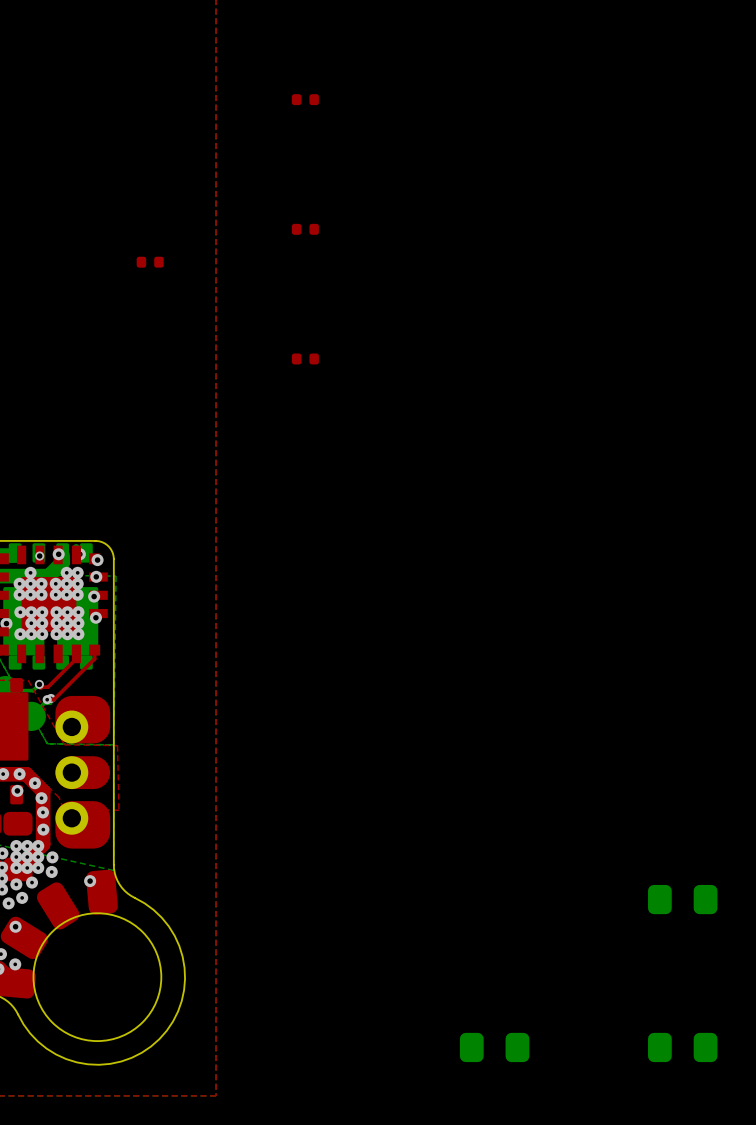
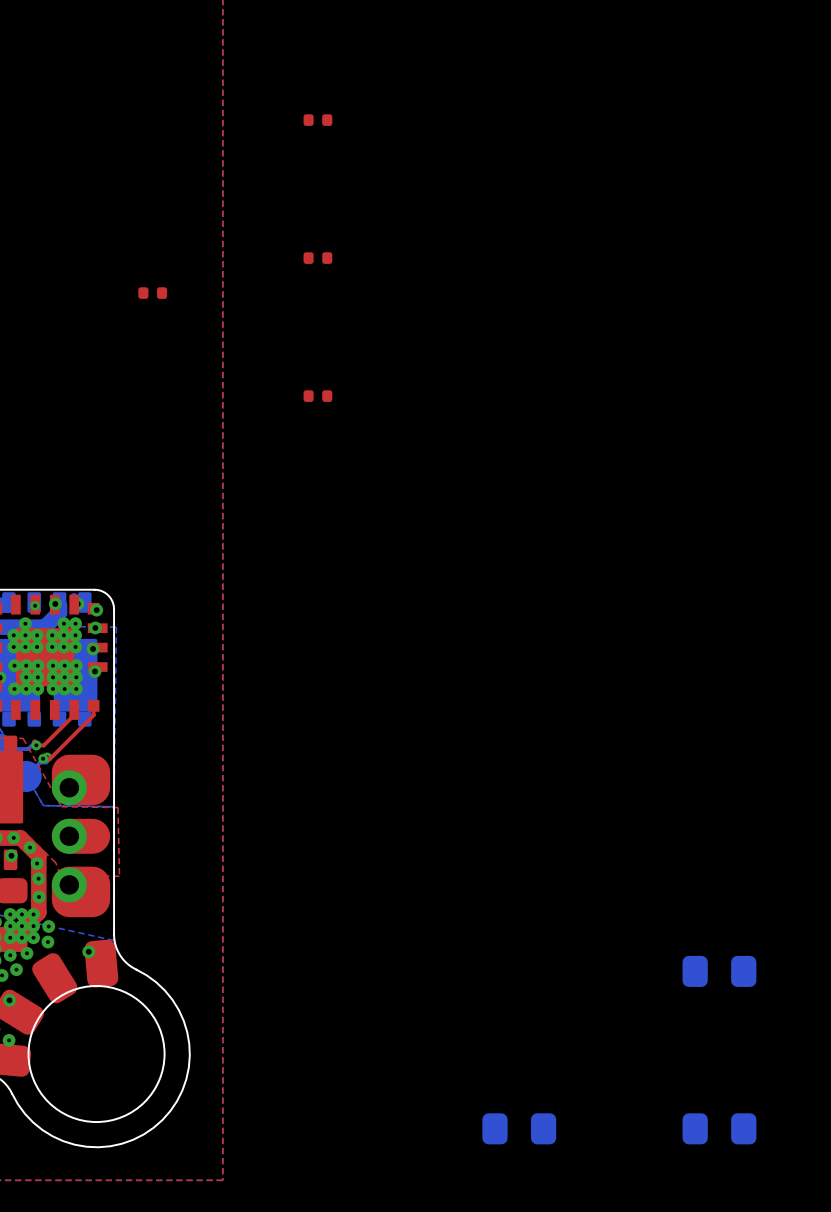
via: (39, 556) -> none
via: none -> (35, 605)
via: (39, 684) -> none
via: none -> (36, 745)

